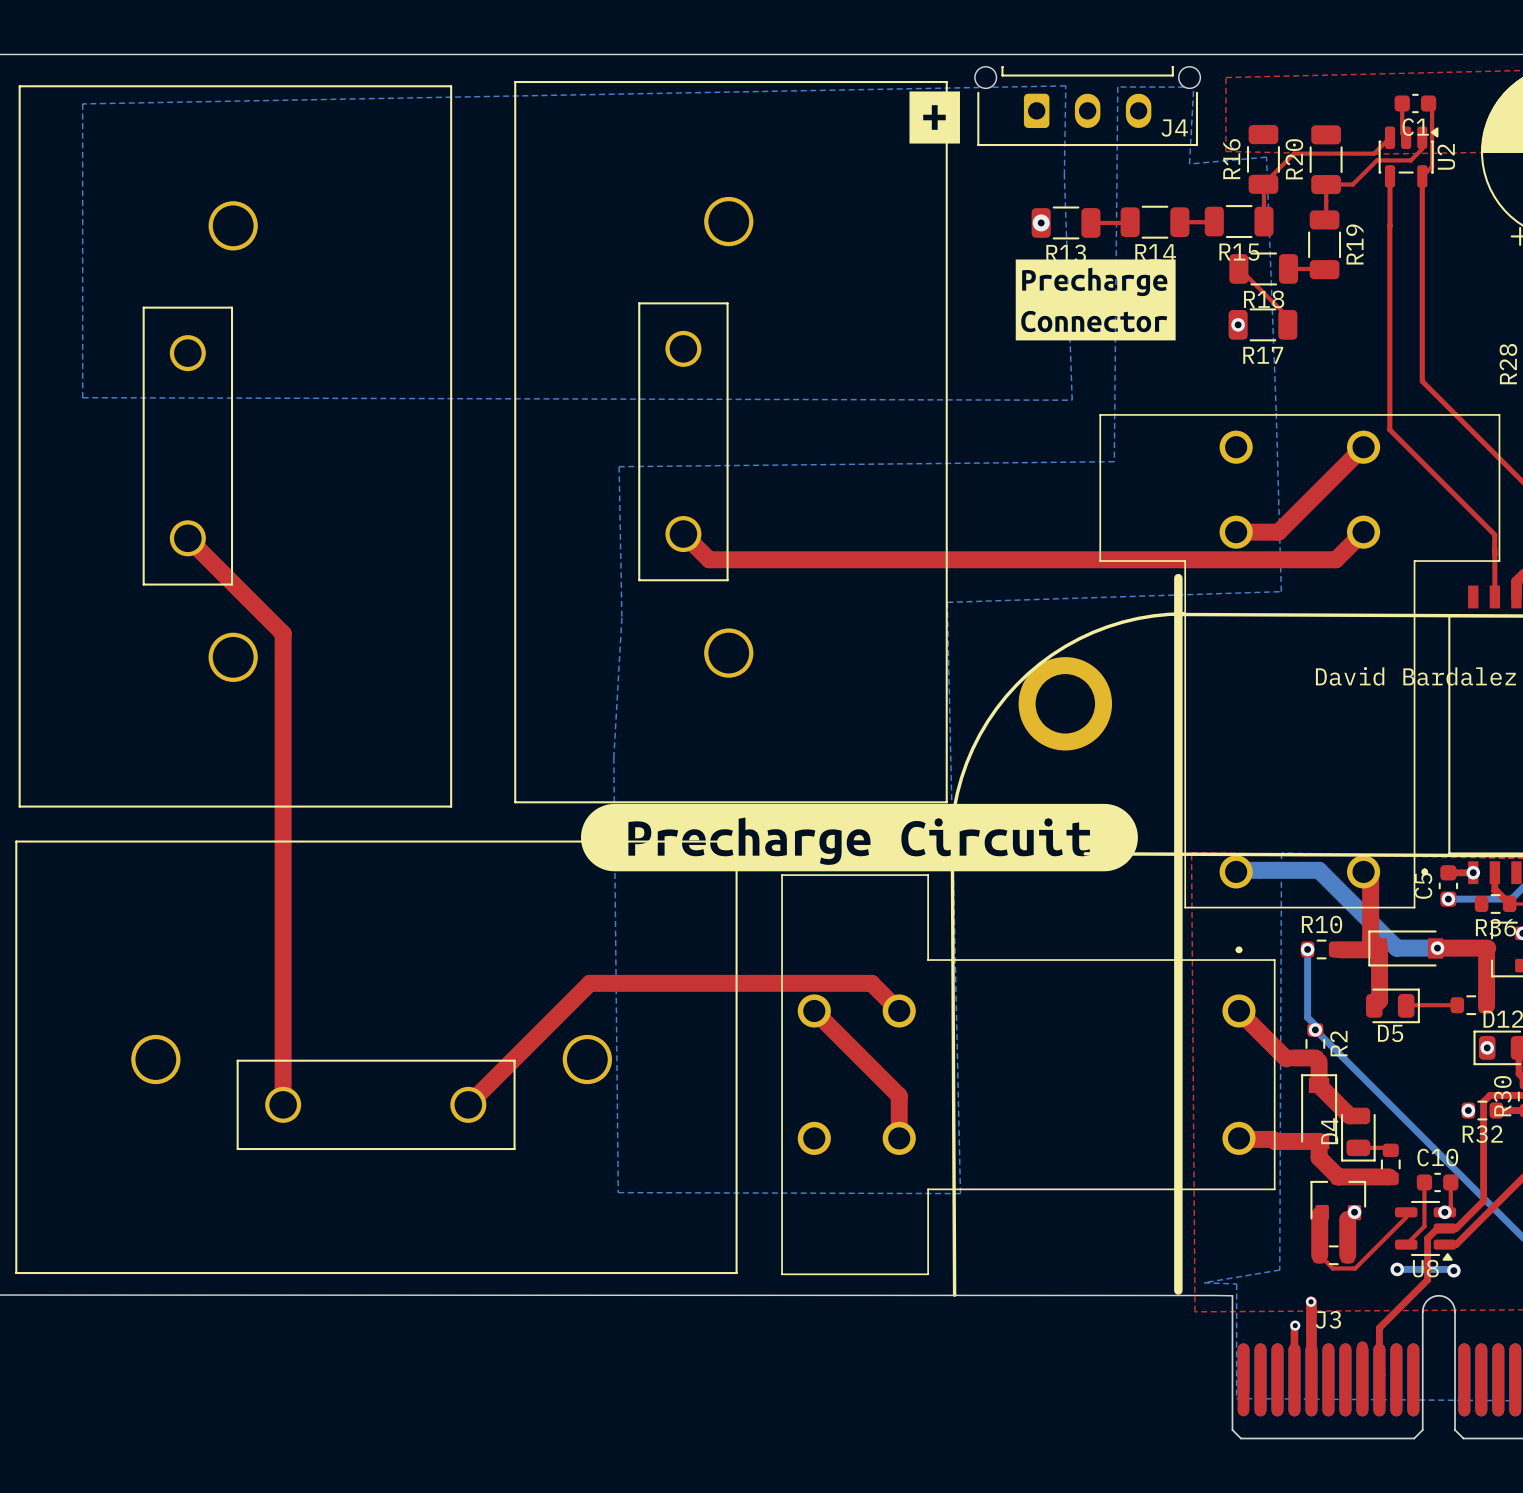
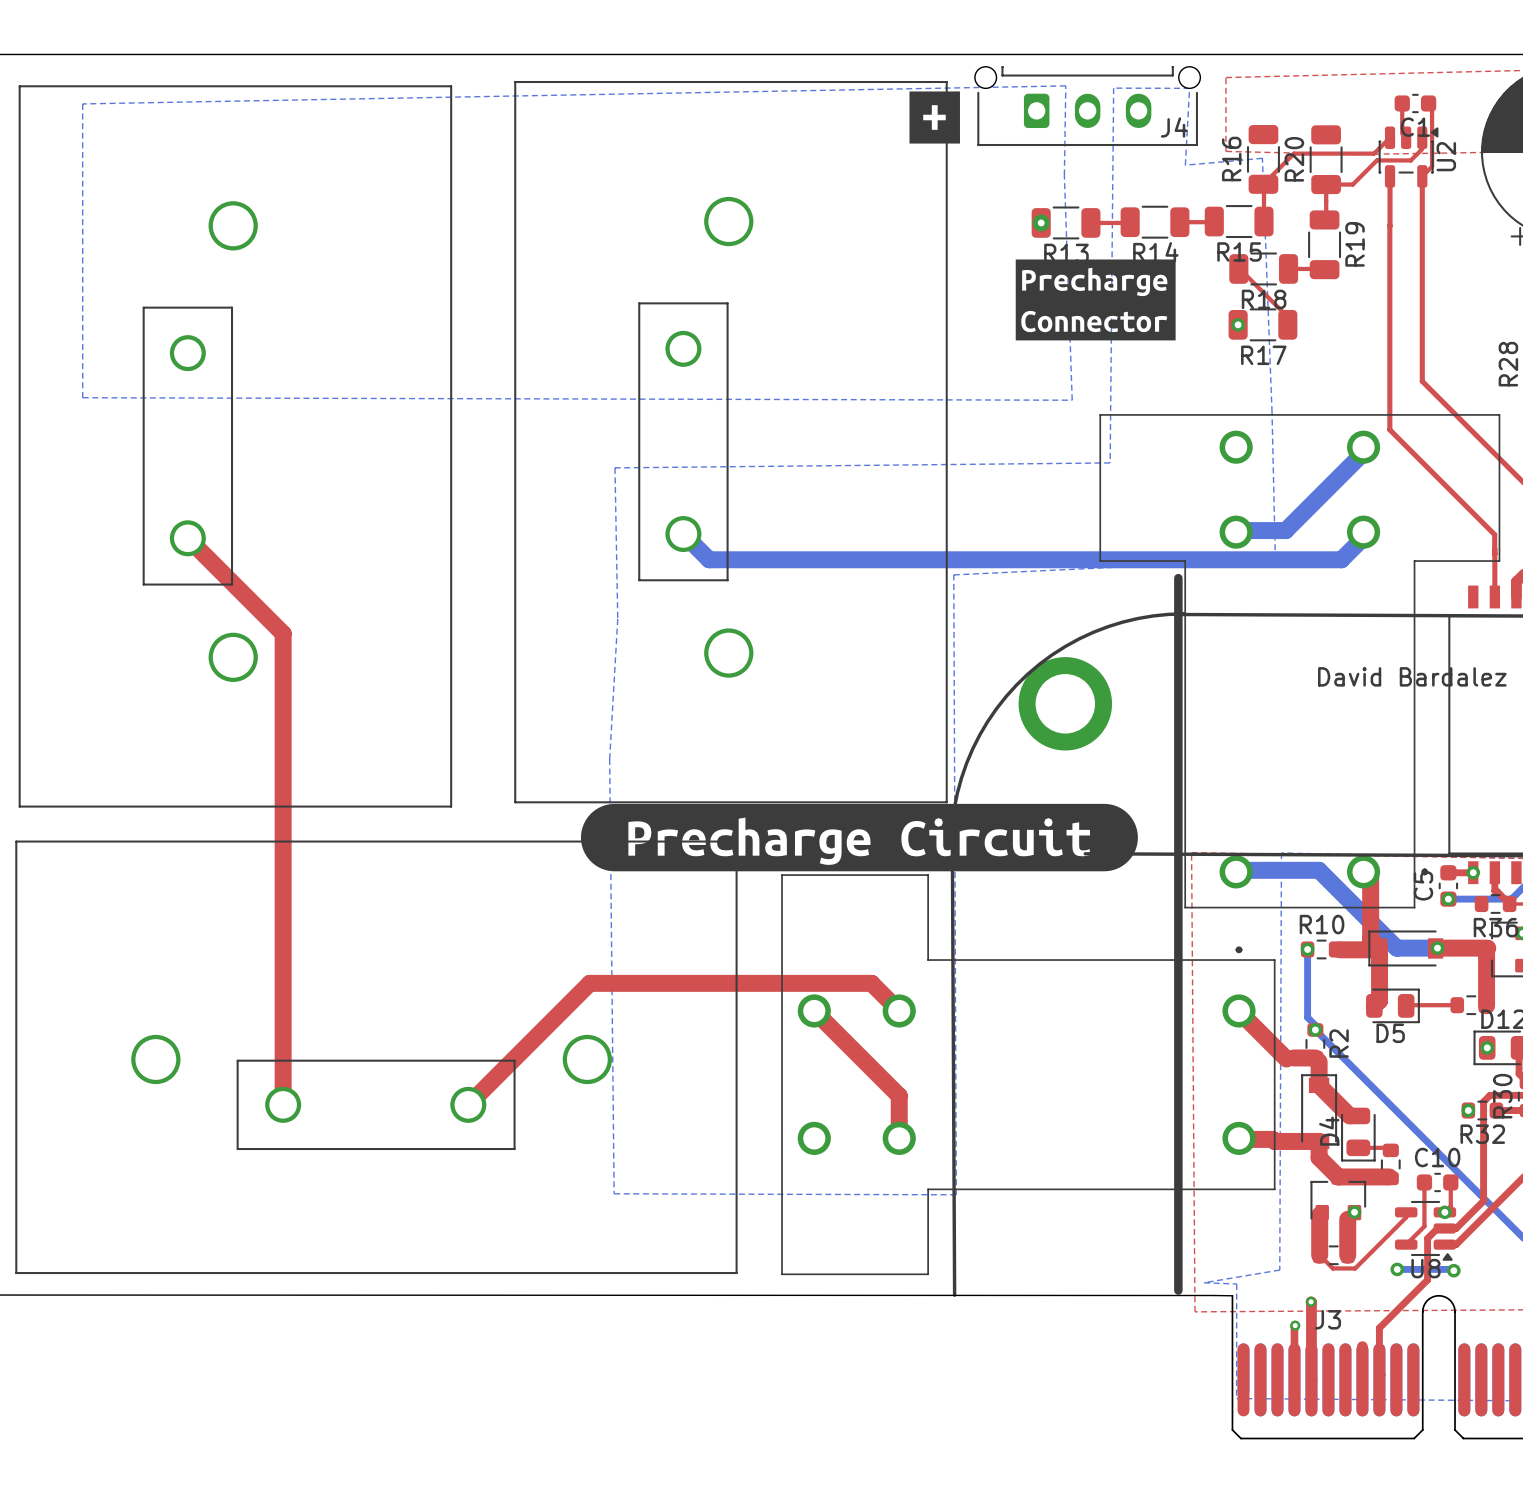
bottom zone outline: (1117, 86) (1114, 461) (619, 466) (621, 617) (613, 757) (618, 1192) (960, 1193) (947, 602) (1281, 591) (1266, 157) (1189, 164) (1193, 87) (1117, 86) -> (1113, 88) (1110, 462) (614, 467) (617, 619) (609, 758) (614, 1193) (956, 1194) (953, 574) (1275, 559) (1262, 158) (1185, 165) (1189, 88) (1113, 88)
bottom track: none -> (1370, 445) (1285, 530) (1243, 530)
top track: (1363, 447) (1278, 532) (1236, 532) -> none
bottom track: none -> (1370, 530) (1341, 559) (709, 559) (683, 534)
top track: (1363, 532) (1335, 559) (709, 559) (683, 534) -> none

